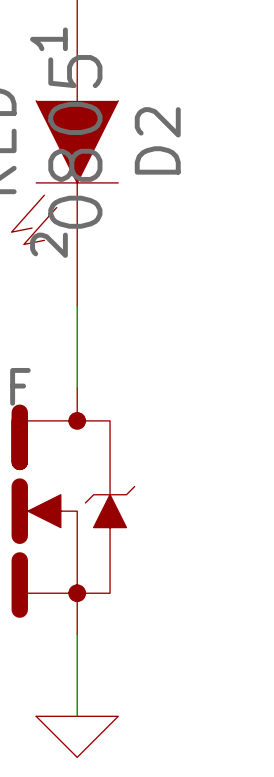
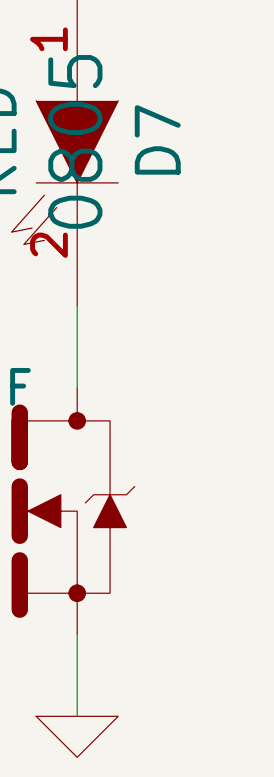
D2 name: D2 (157, 140) -> D7 (157, 139)

